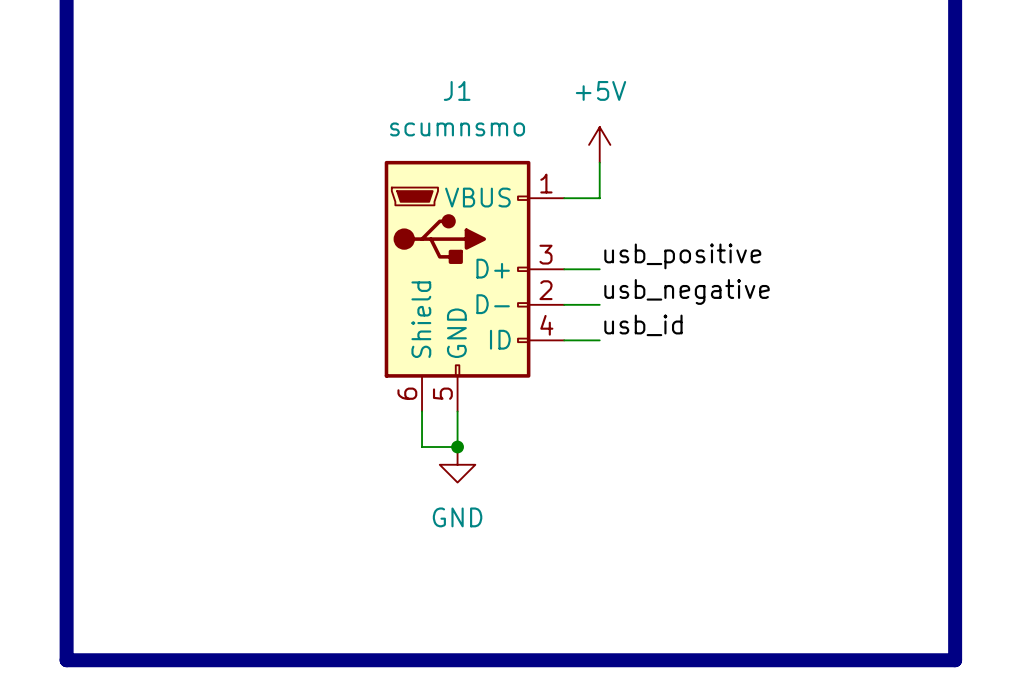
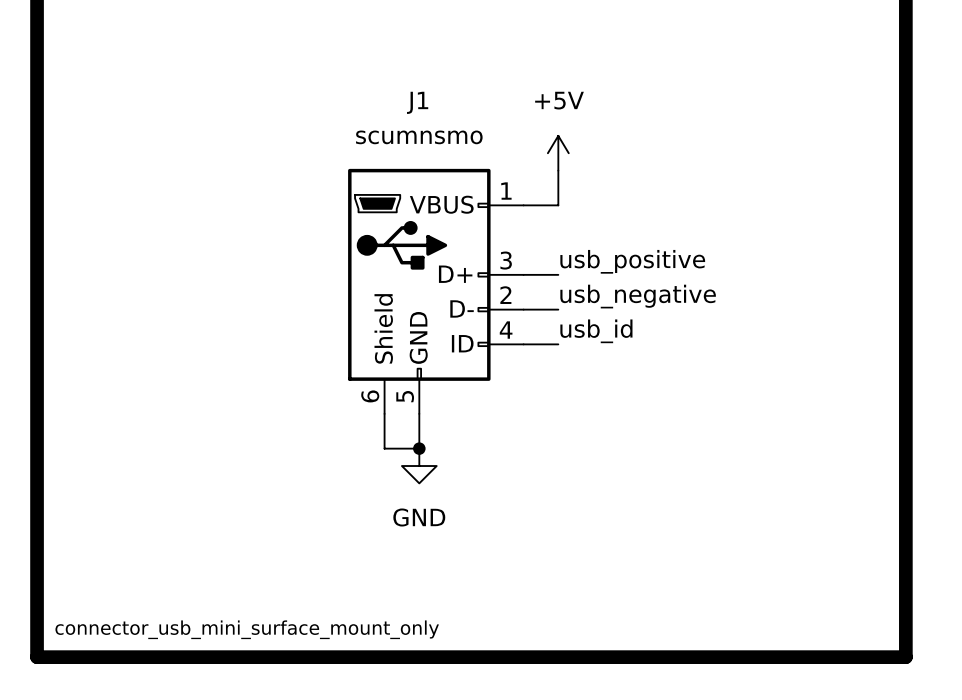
text: none -> connector_usb_mini_surface_mount_only (247, 629)

